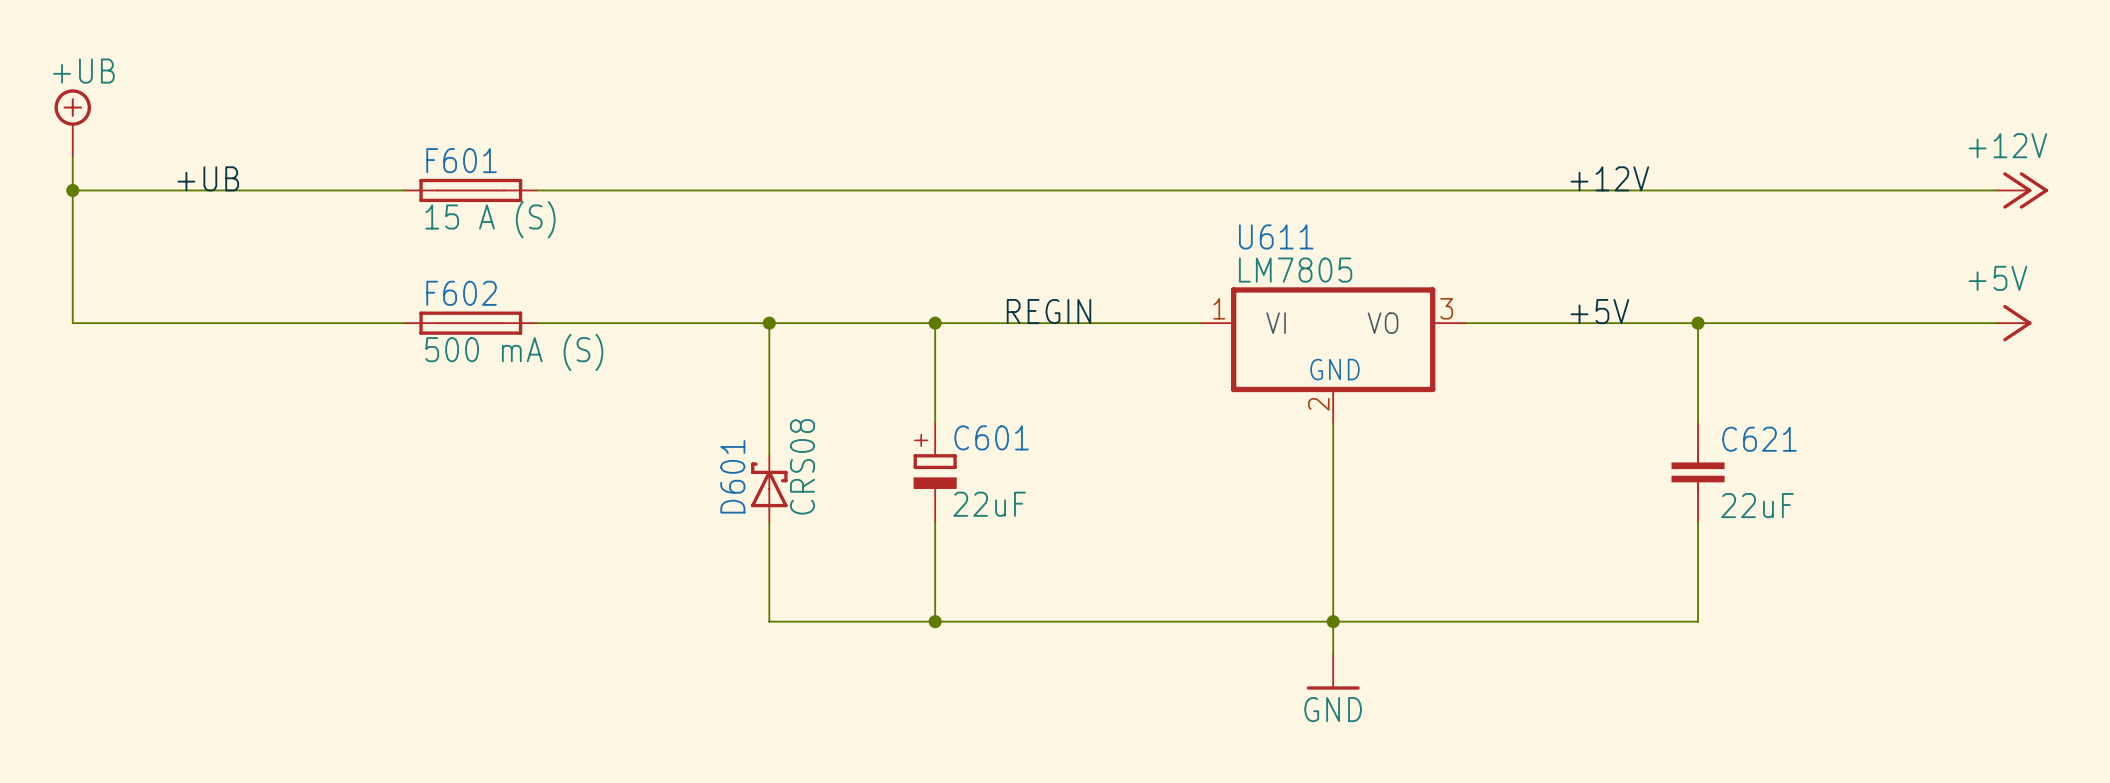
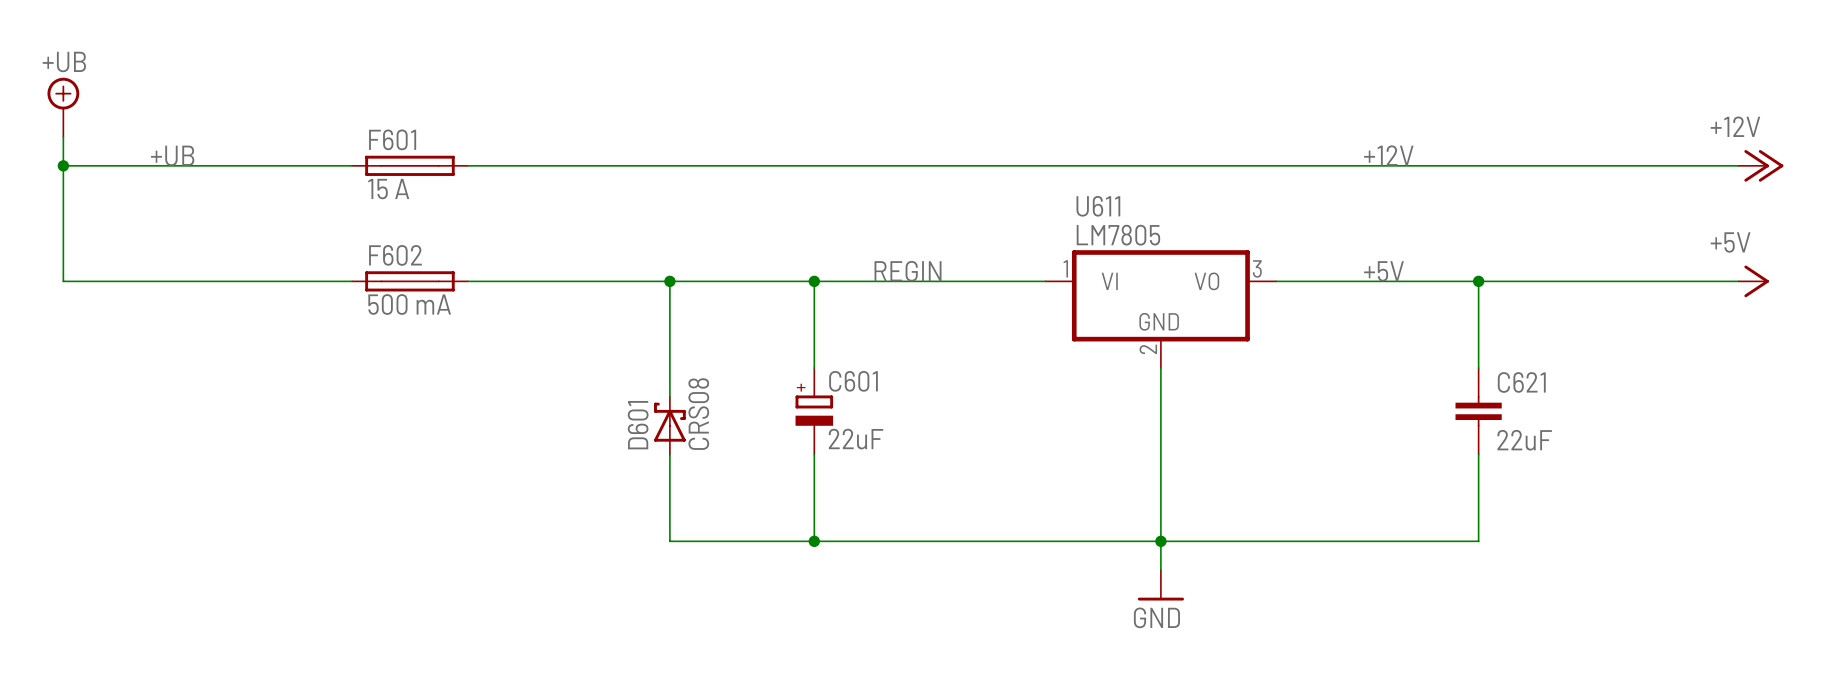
F601 value: 15 A (S) (490, 219) -> 15 A (388, 189)
F602 value: 500 mA (S) (514, 352) -> 500 mA (409, 304)

